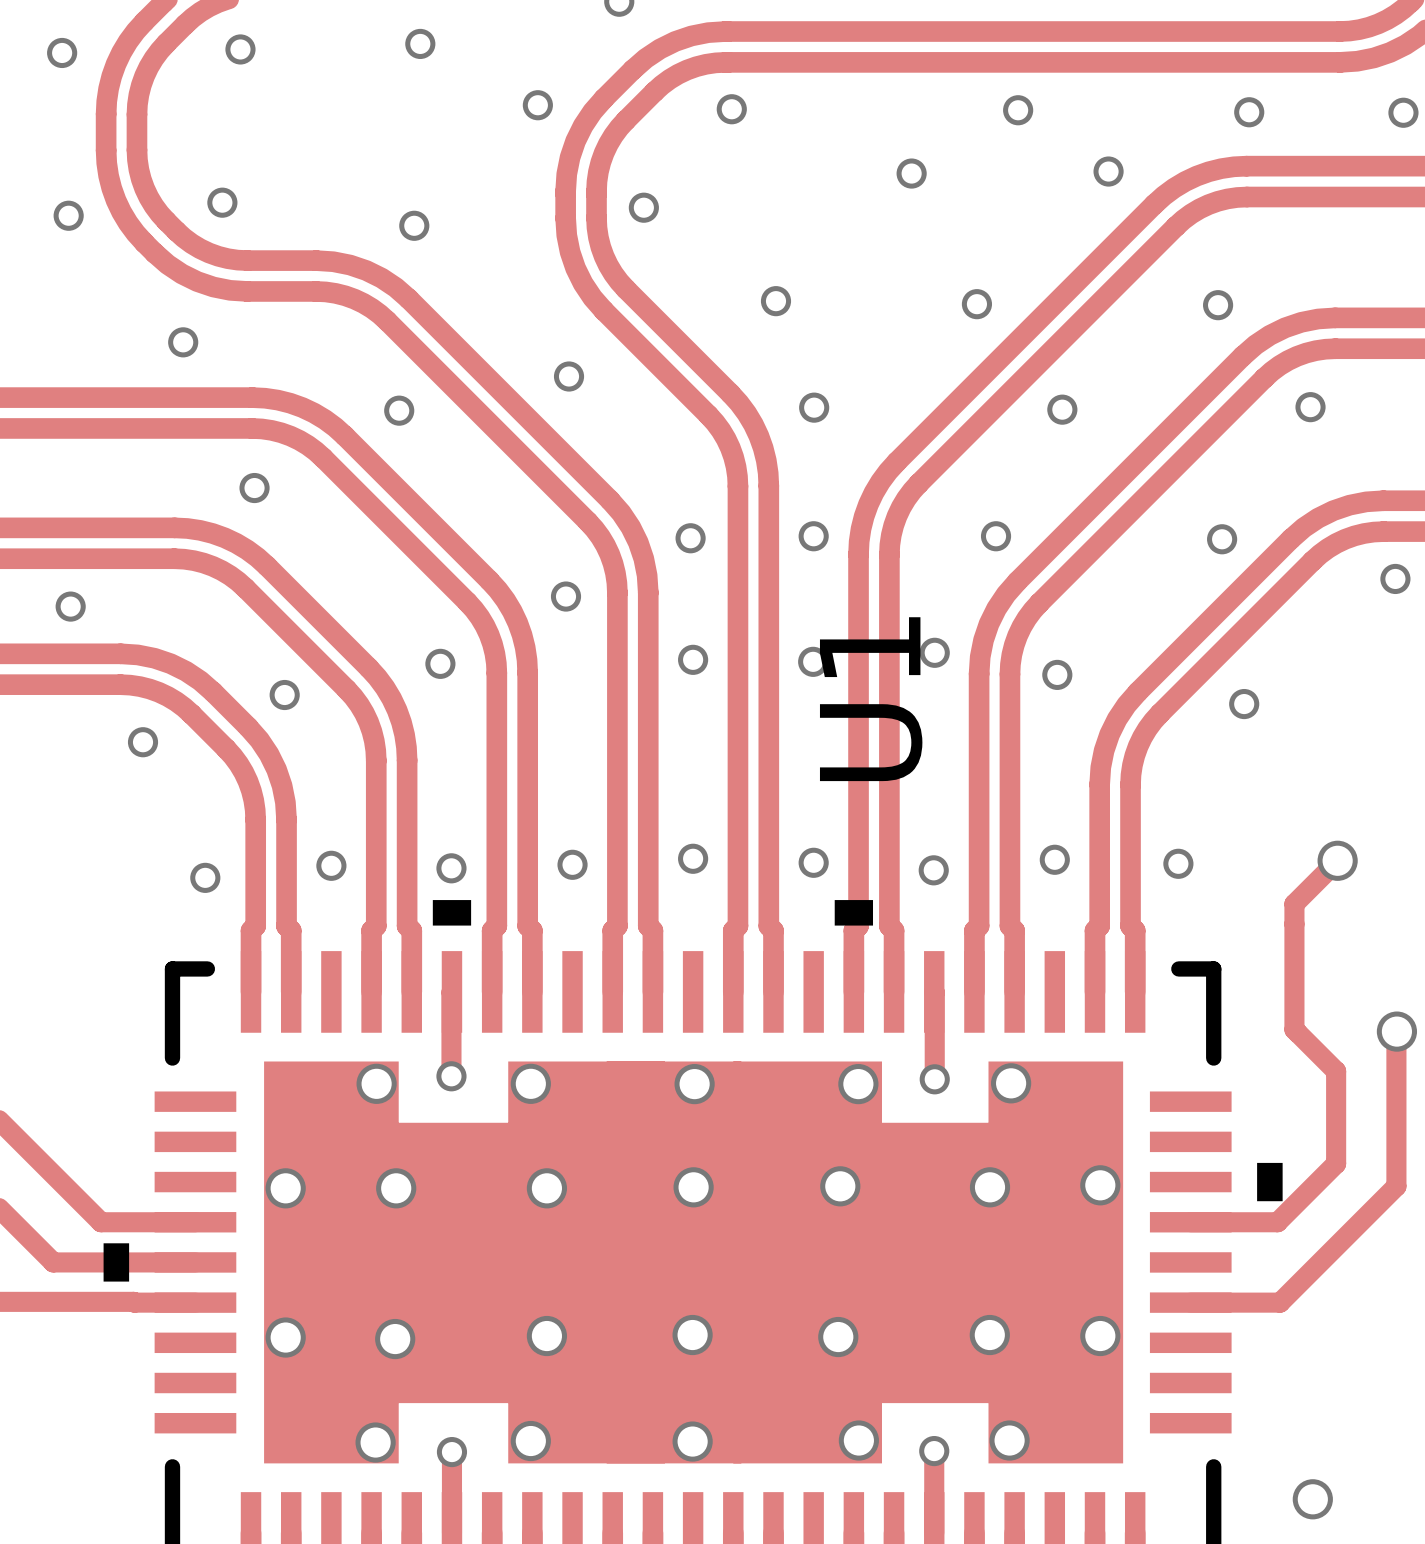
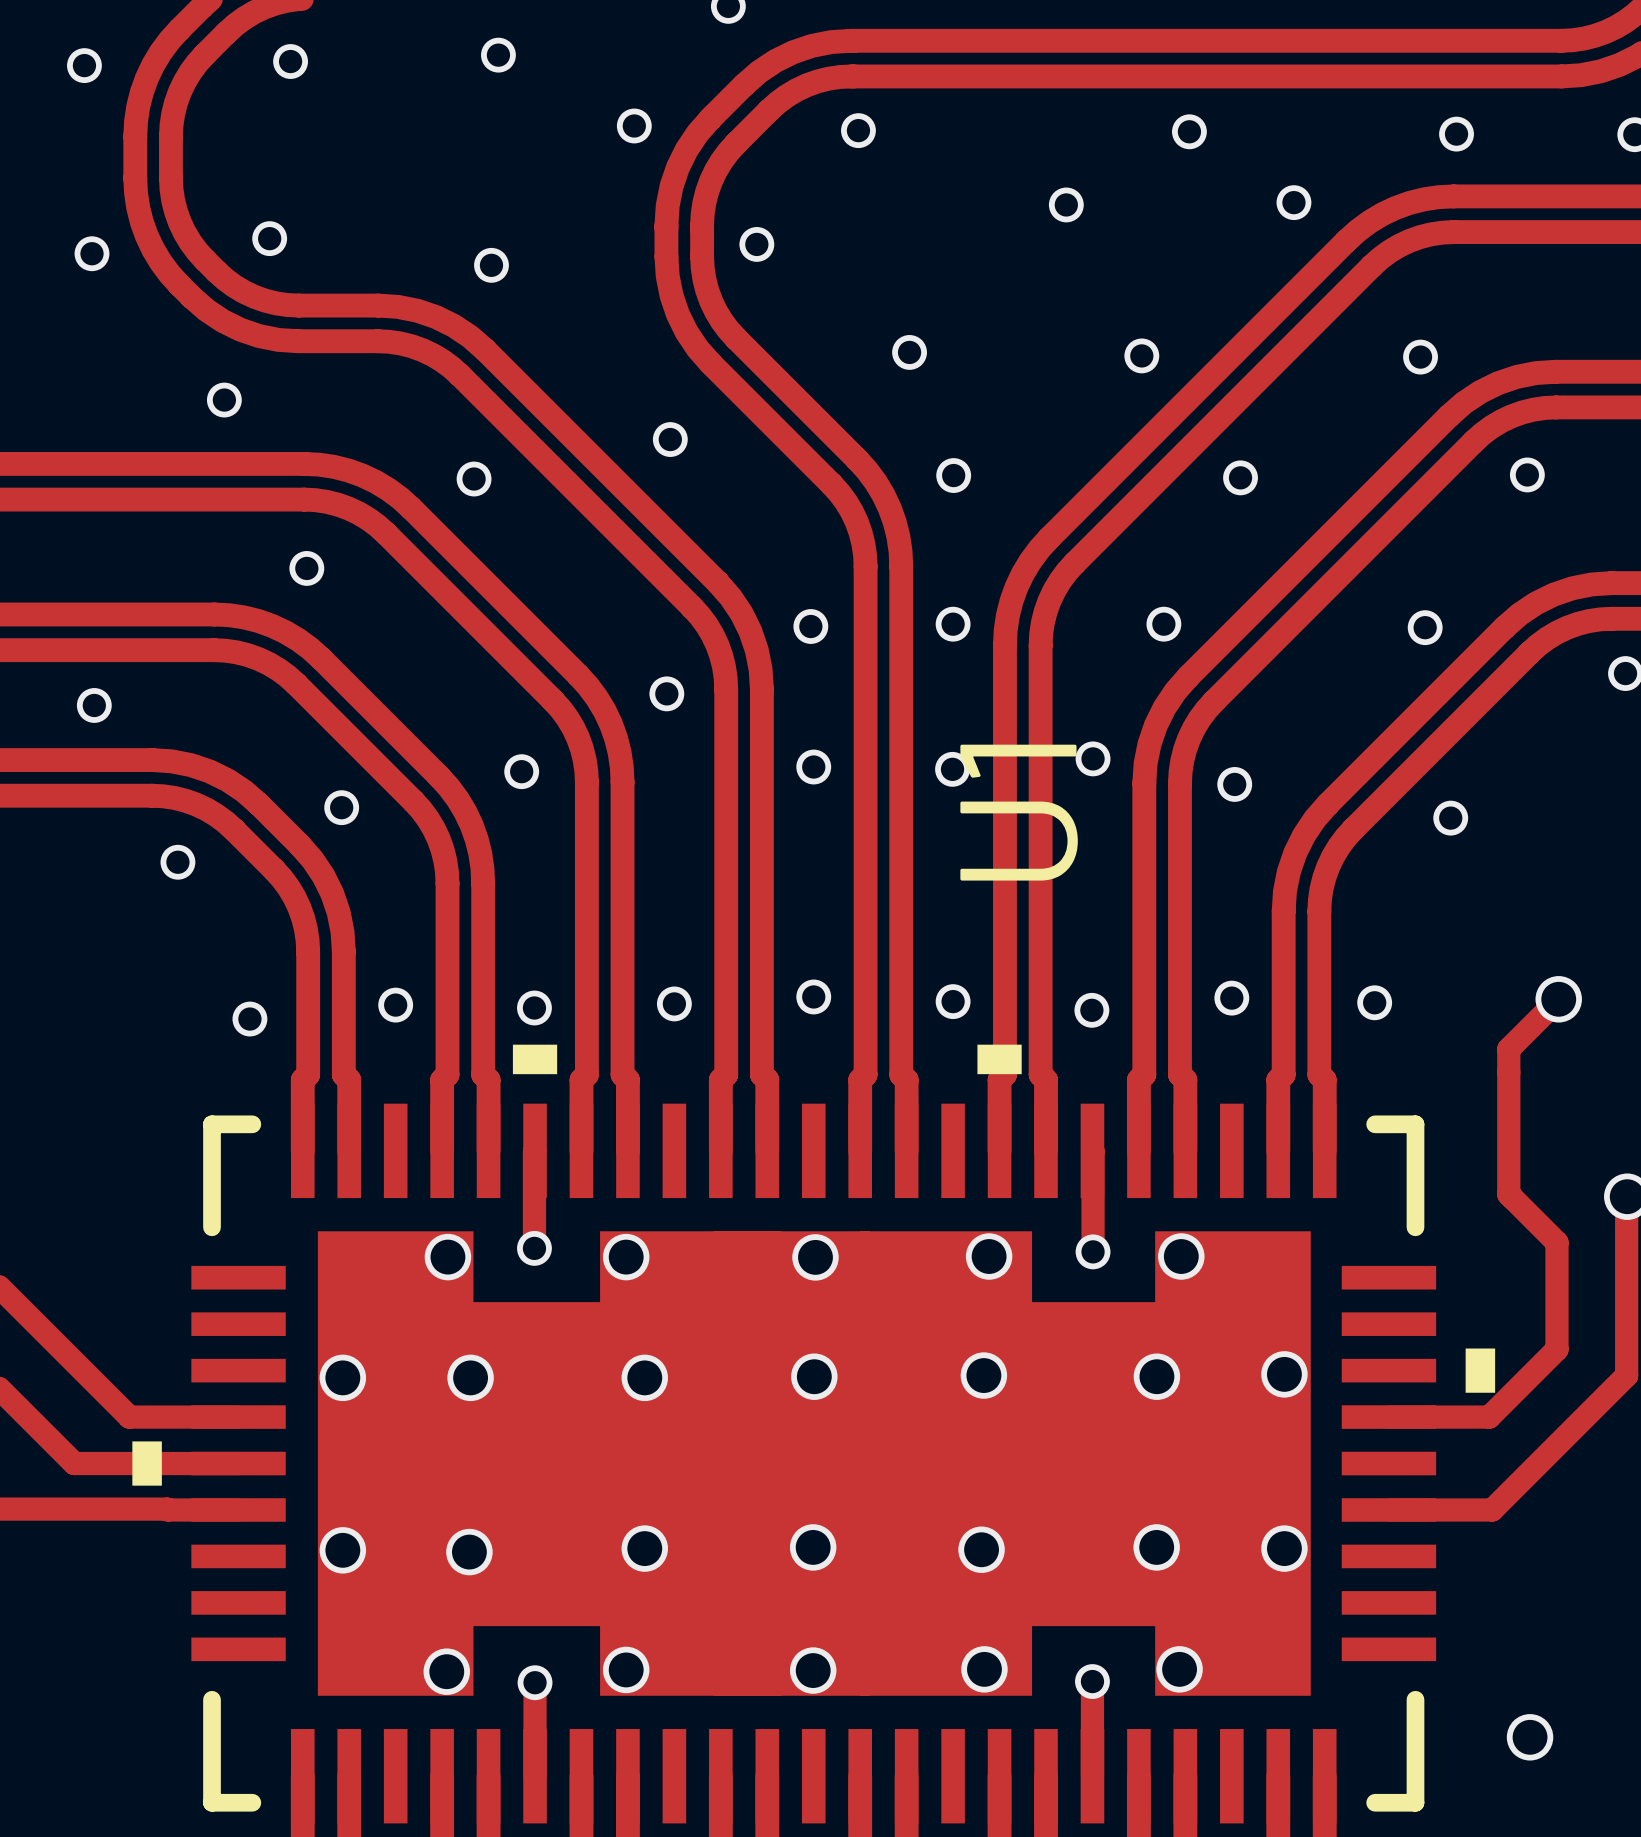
via position: (858, 1084) -> (989, 1256)
via position: (858, 1440) -> (984, 1669)

